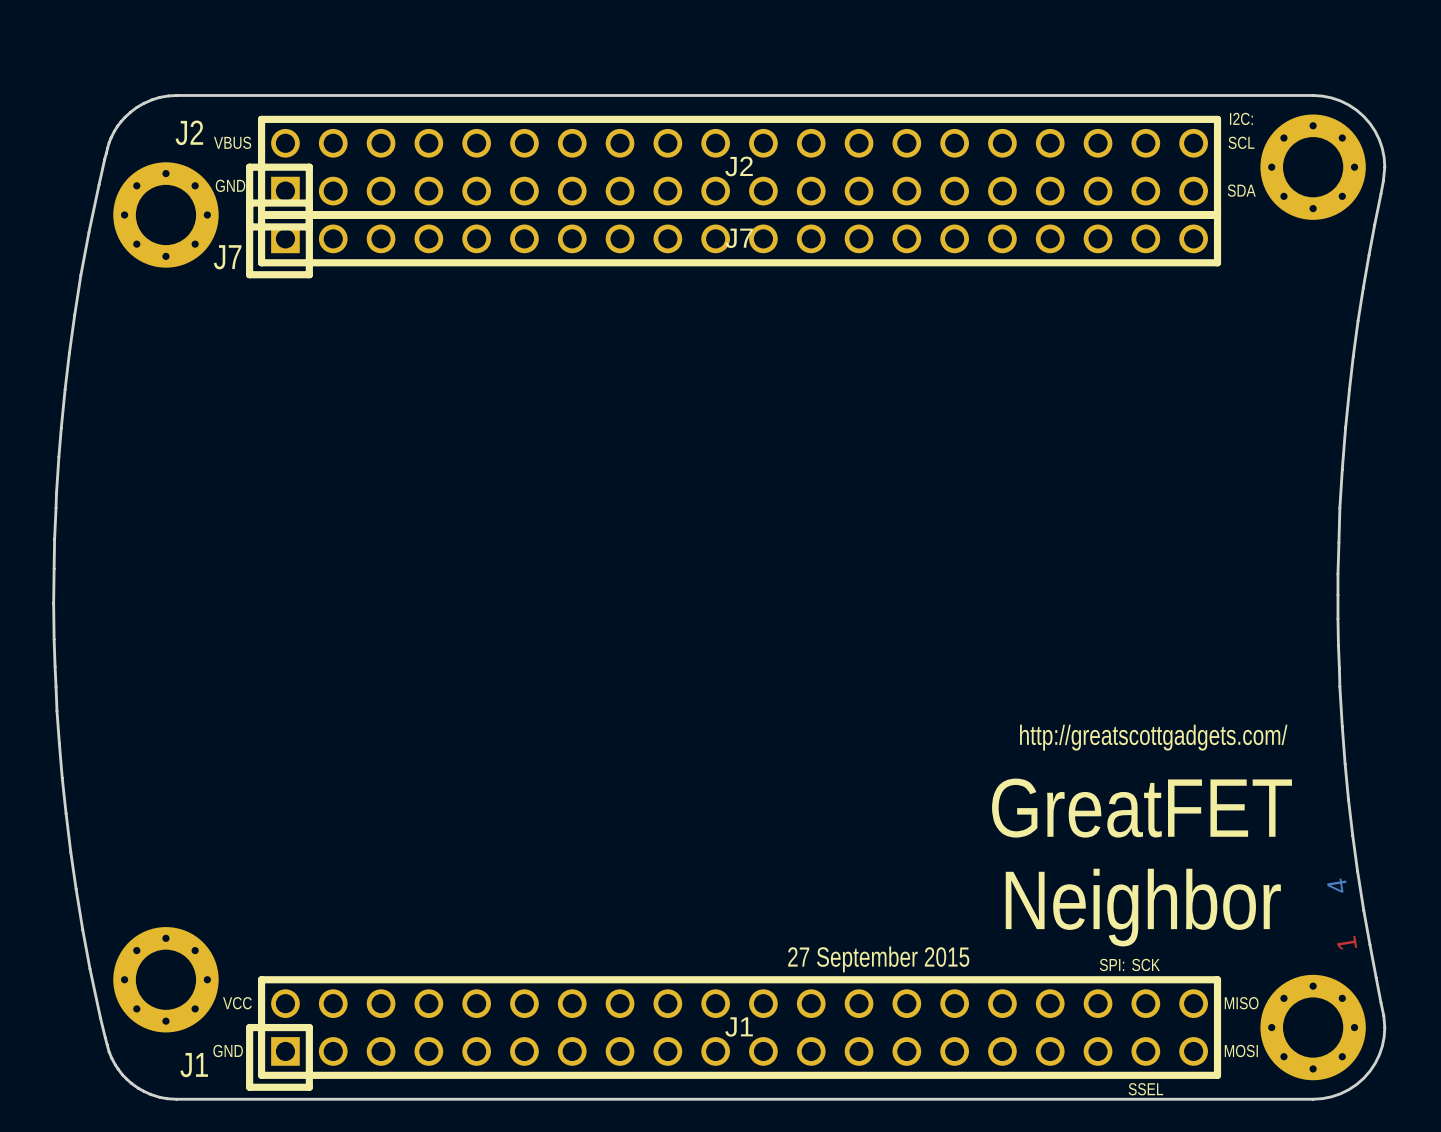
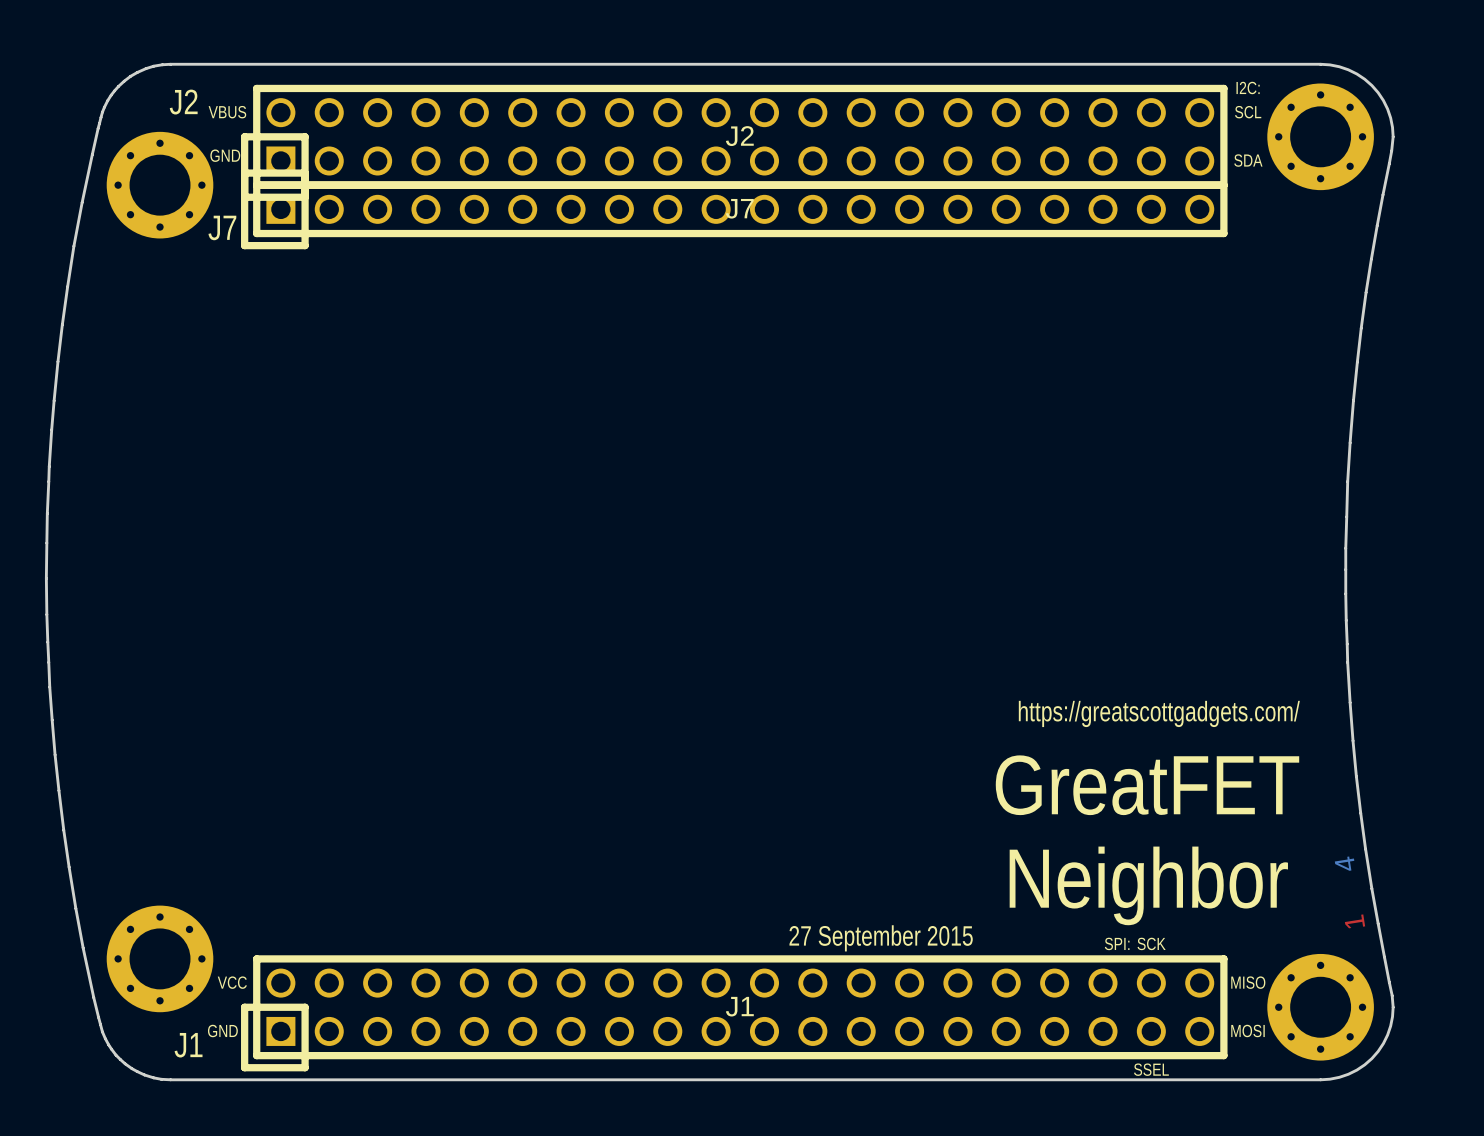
text: http://greatscottgadgets.com/ (1153, 737) -> https://greatscottgadgets.com/ (1159, 713)

